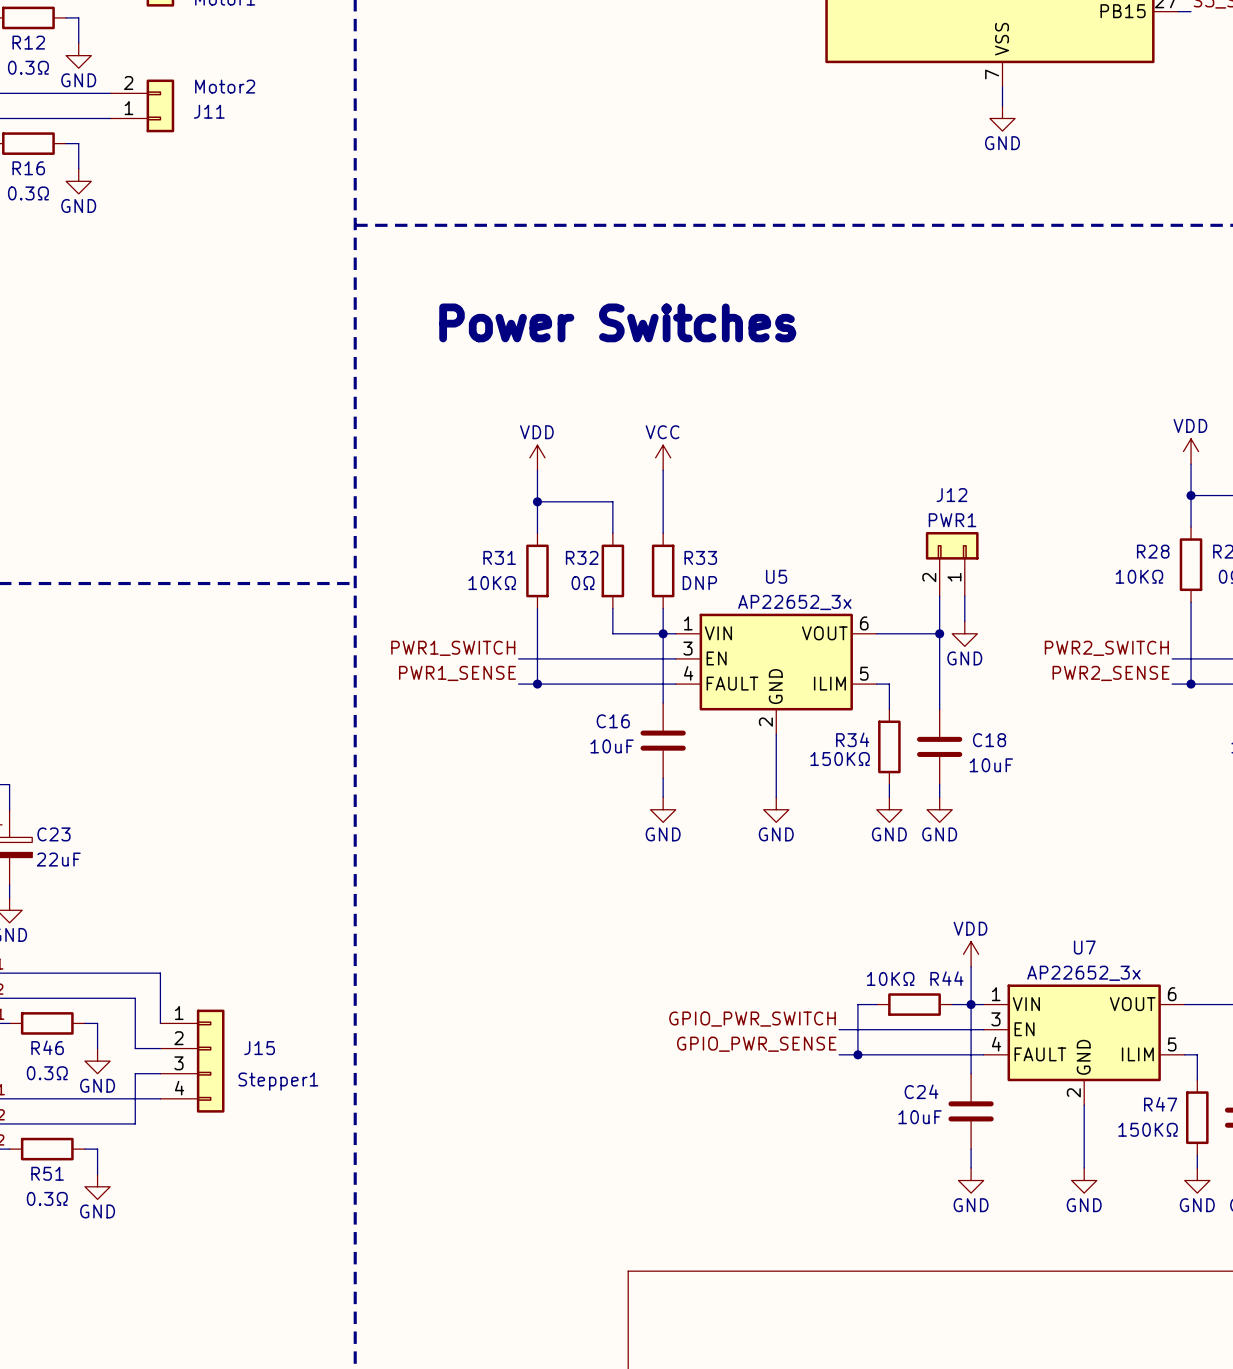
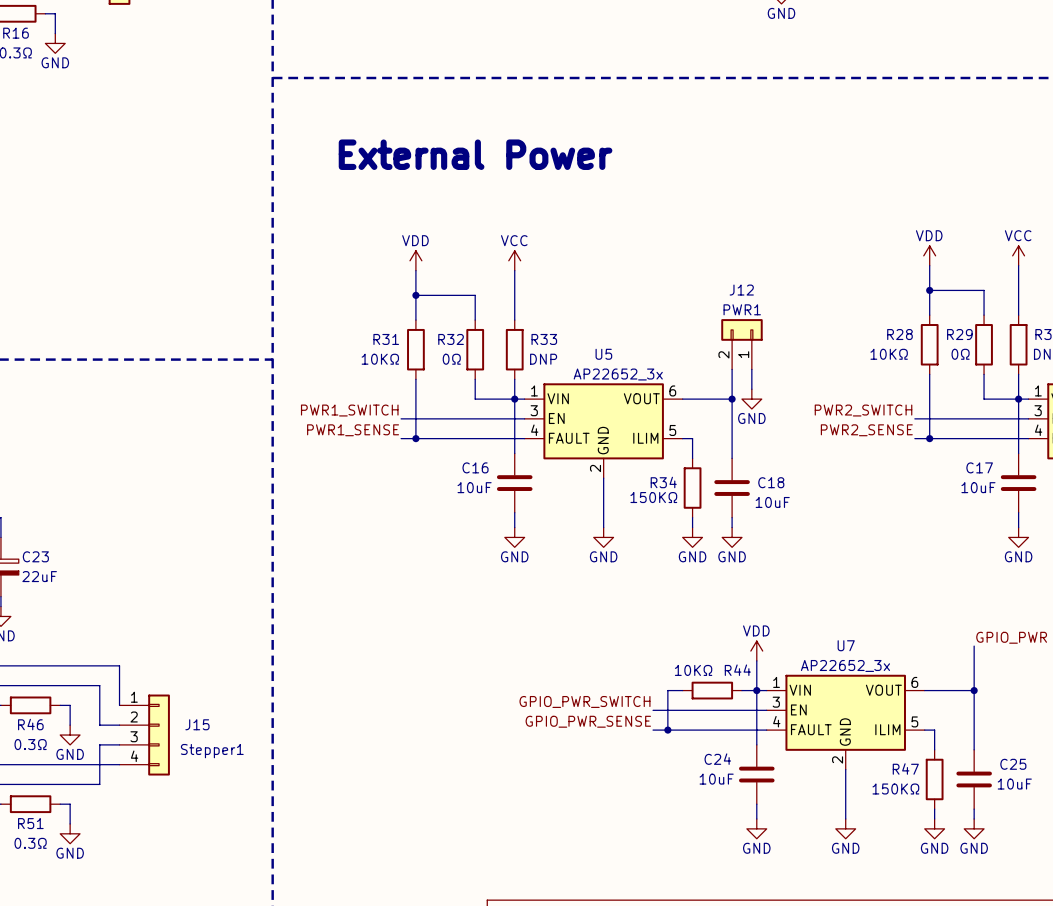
text: Power Switches (617, 322) -> External Power (475, 154)

